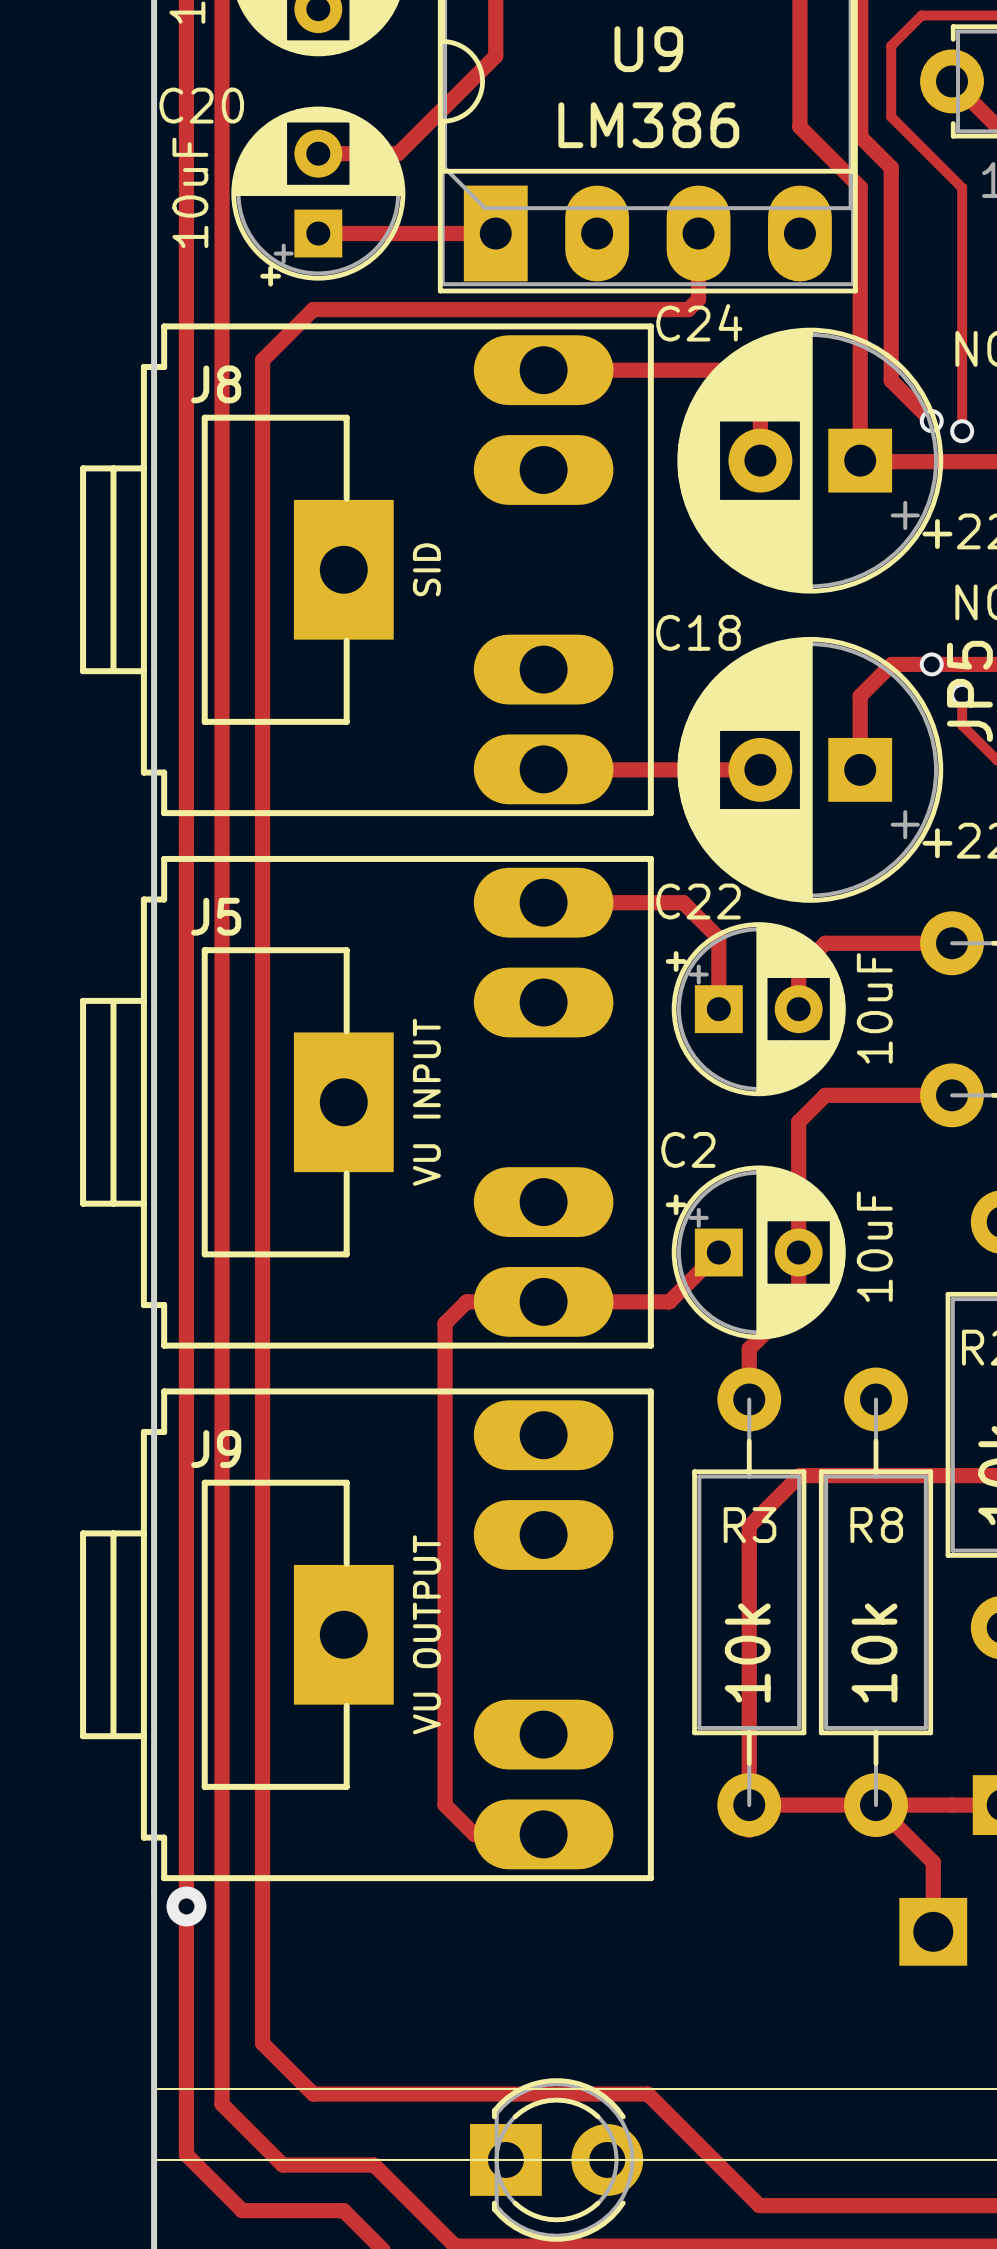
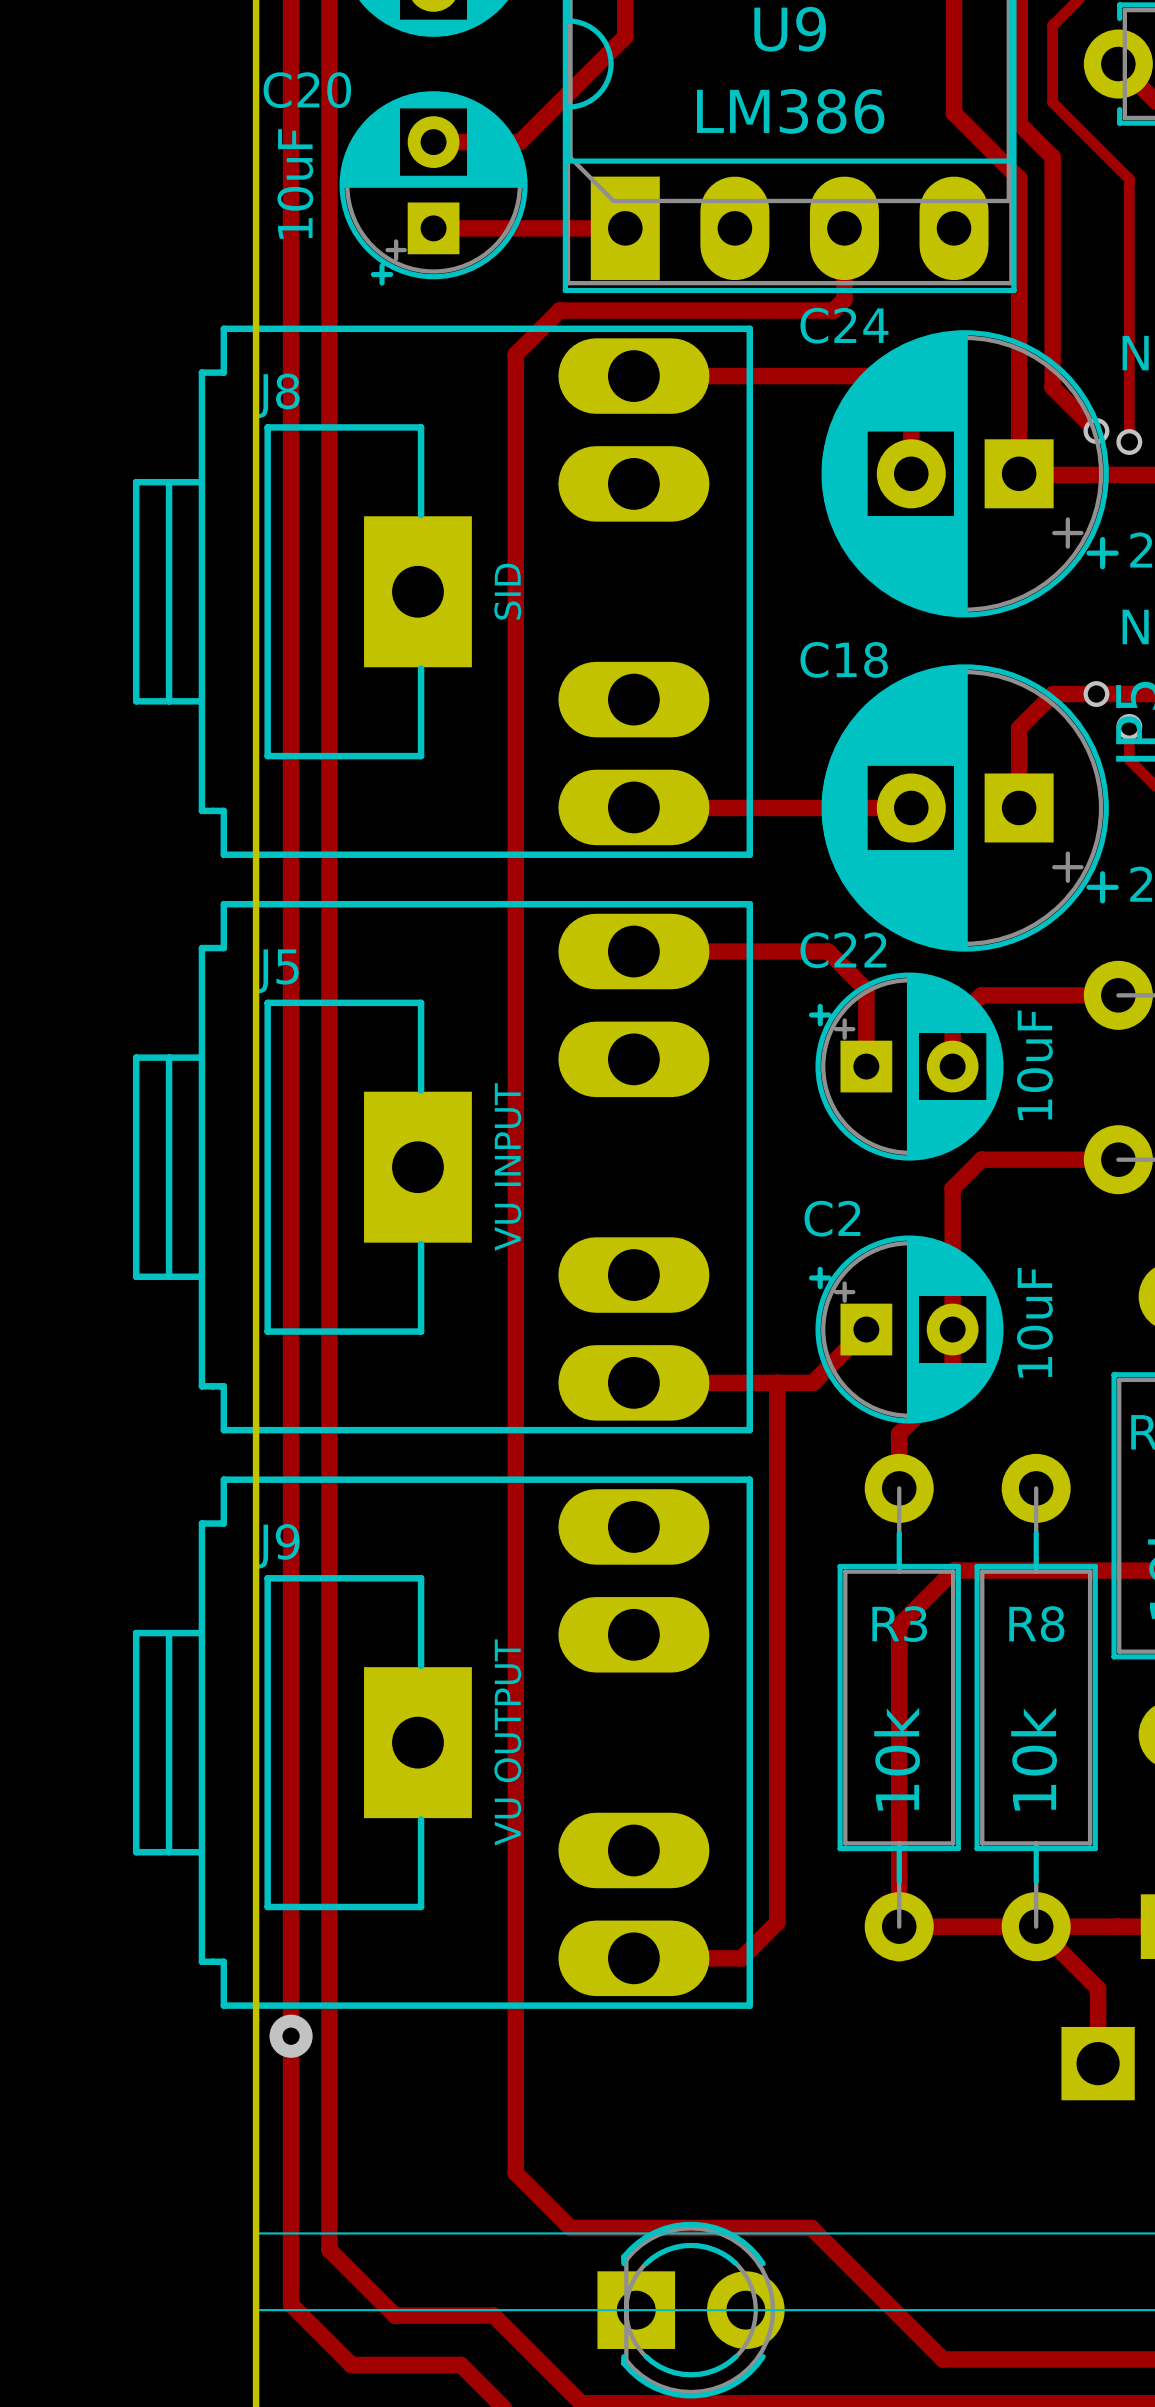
track: (434, 309) (313, 309) (262, 360) (262, 2043) (313, 2094) (647, 2094) (759, 2205) (789, 2205) -> (559, 310) (515, 354) (515, 2173) (570, 2227) (811, 2227) (943, 2359)
J8 position: (366, 569) -> (442, 591)
J5 position: (366, 1102) -> (442, 1167)
track: (503, 1301) (466, 1301) (445, 1323) (445, 1805) (474, 1834) (503, 1834) -> none
track: none -> (777, 1382) (777, 1922) (741, 1958) (677, 1958)
J9 position: (366, 1634) -> (442, 1742)

